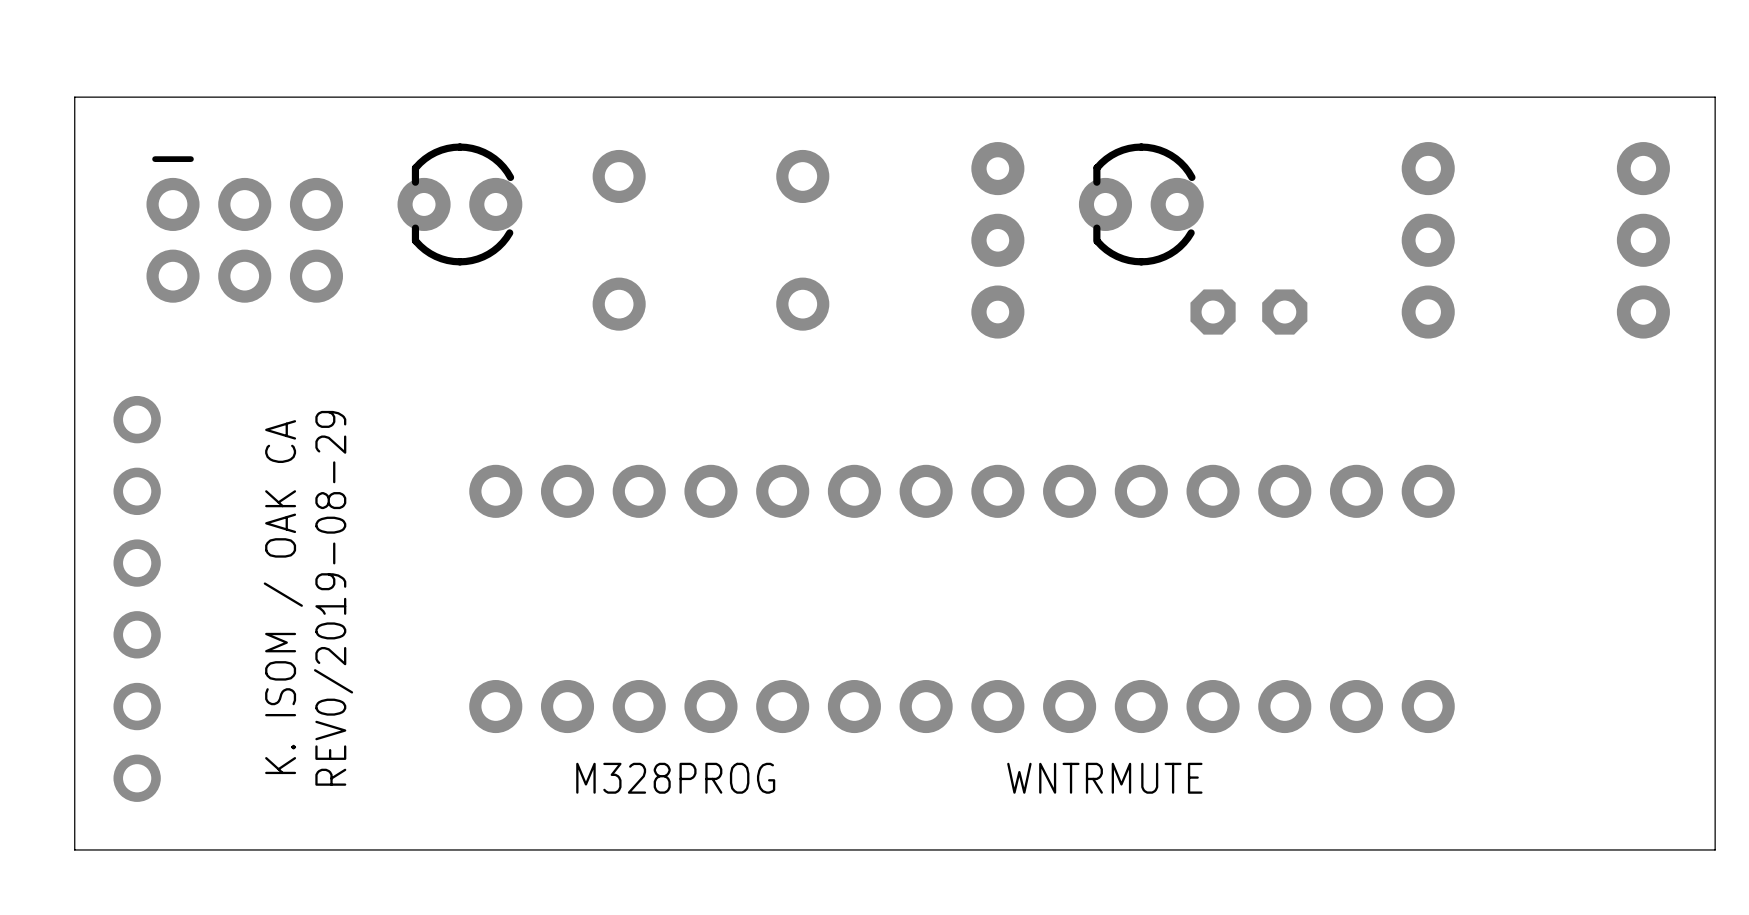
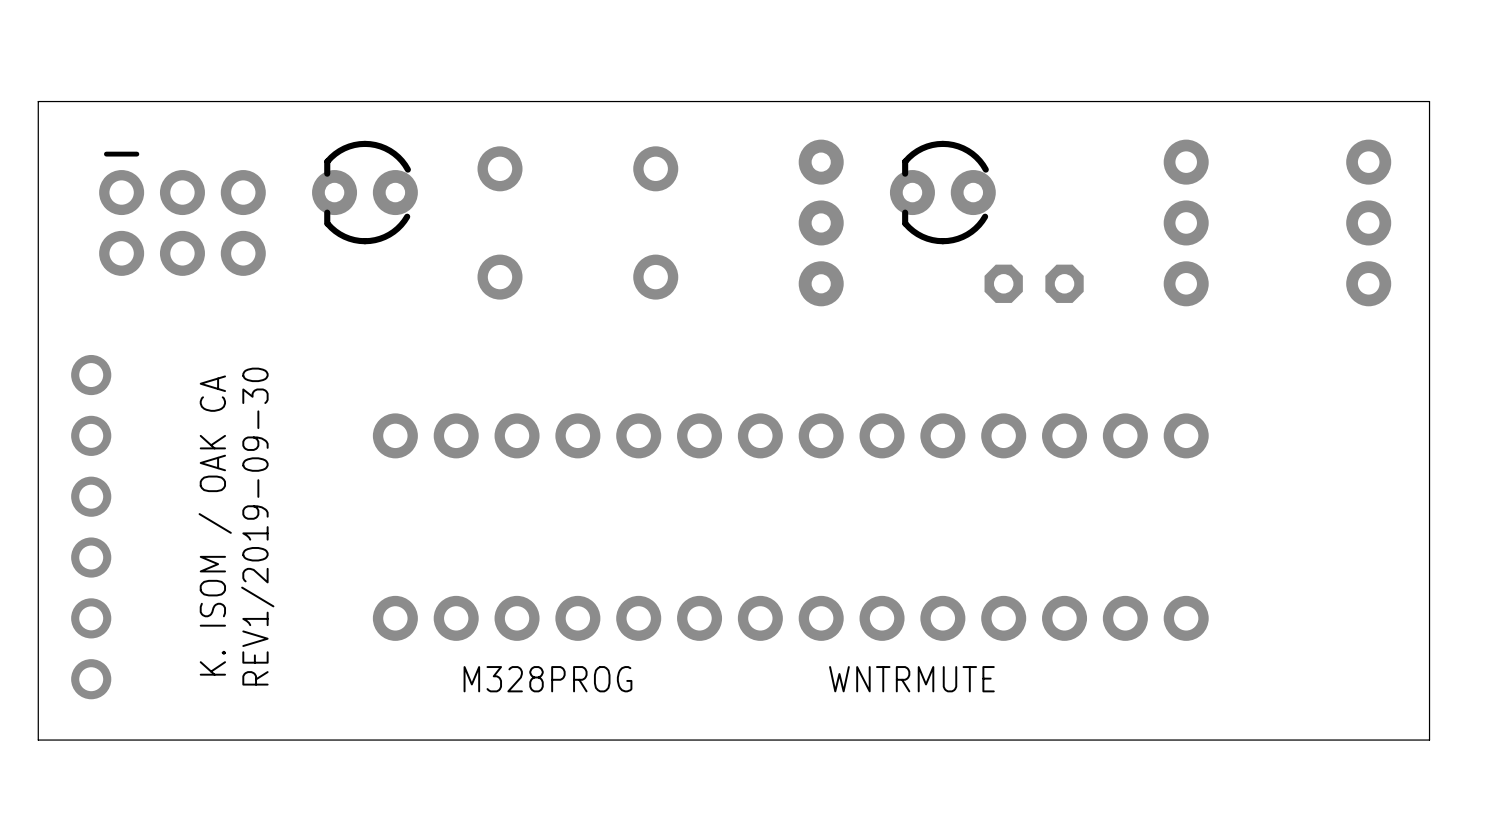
text: REV0/2019-08-29 (333, 598) -> REV1/2019-09-30 (257, 526)

